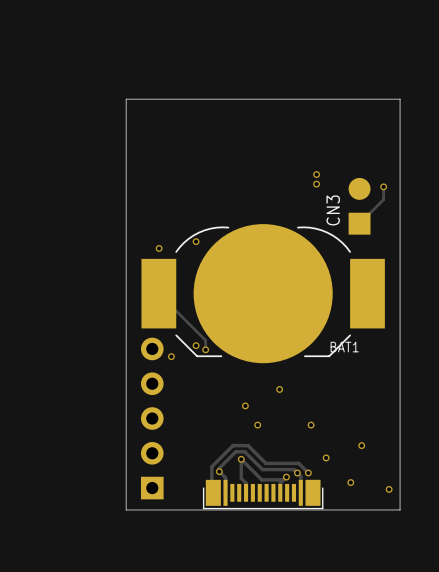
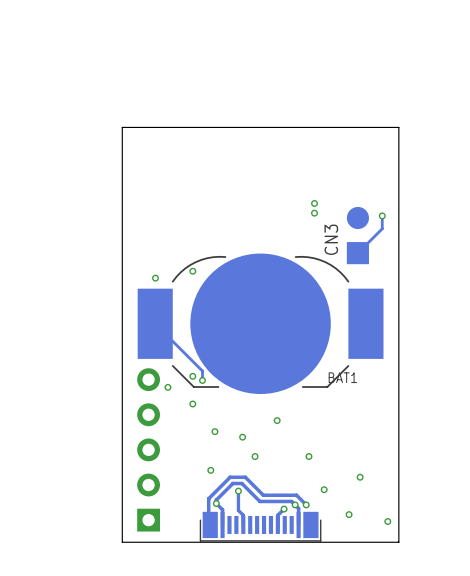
via: none -> (192, 403)
via: none -> (214, 431)
via: none -> (210, 470)
track: (241, 459) (261, 479) (283, 479) -> none

